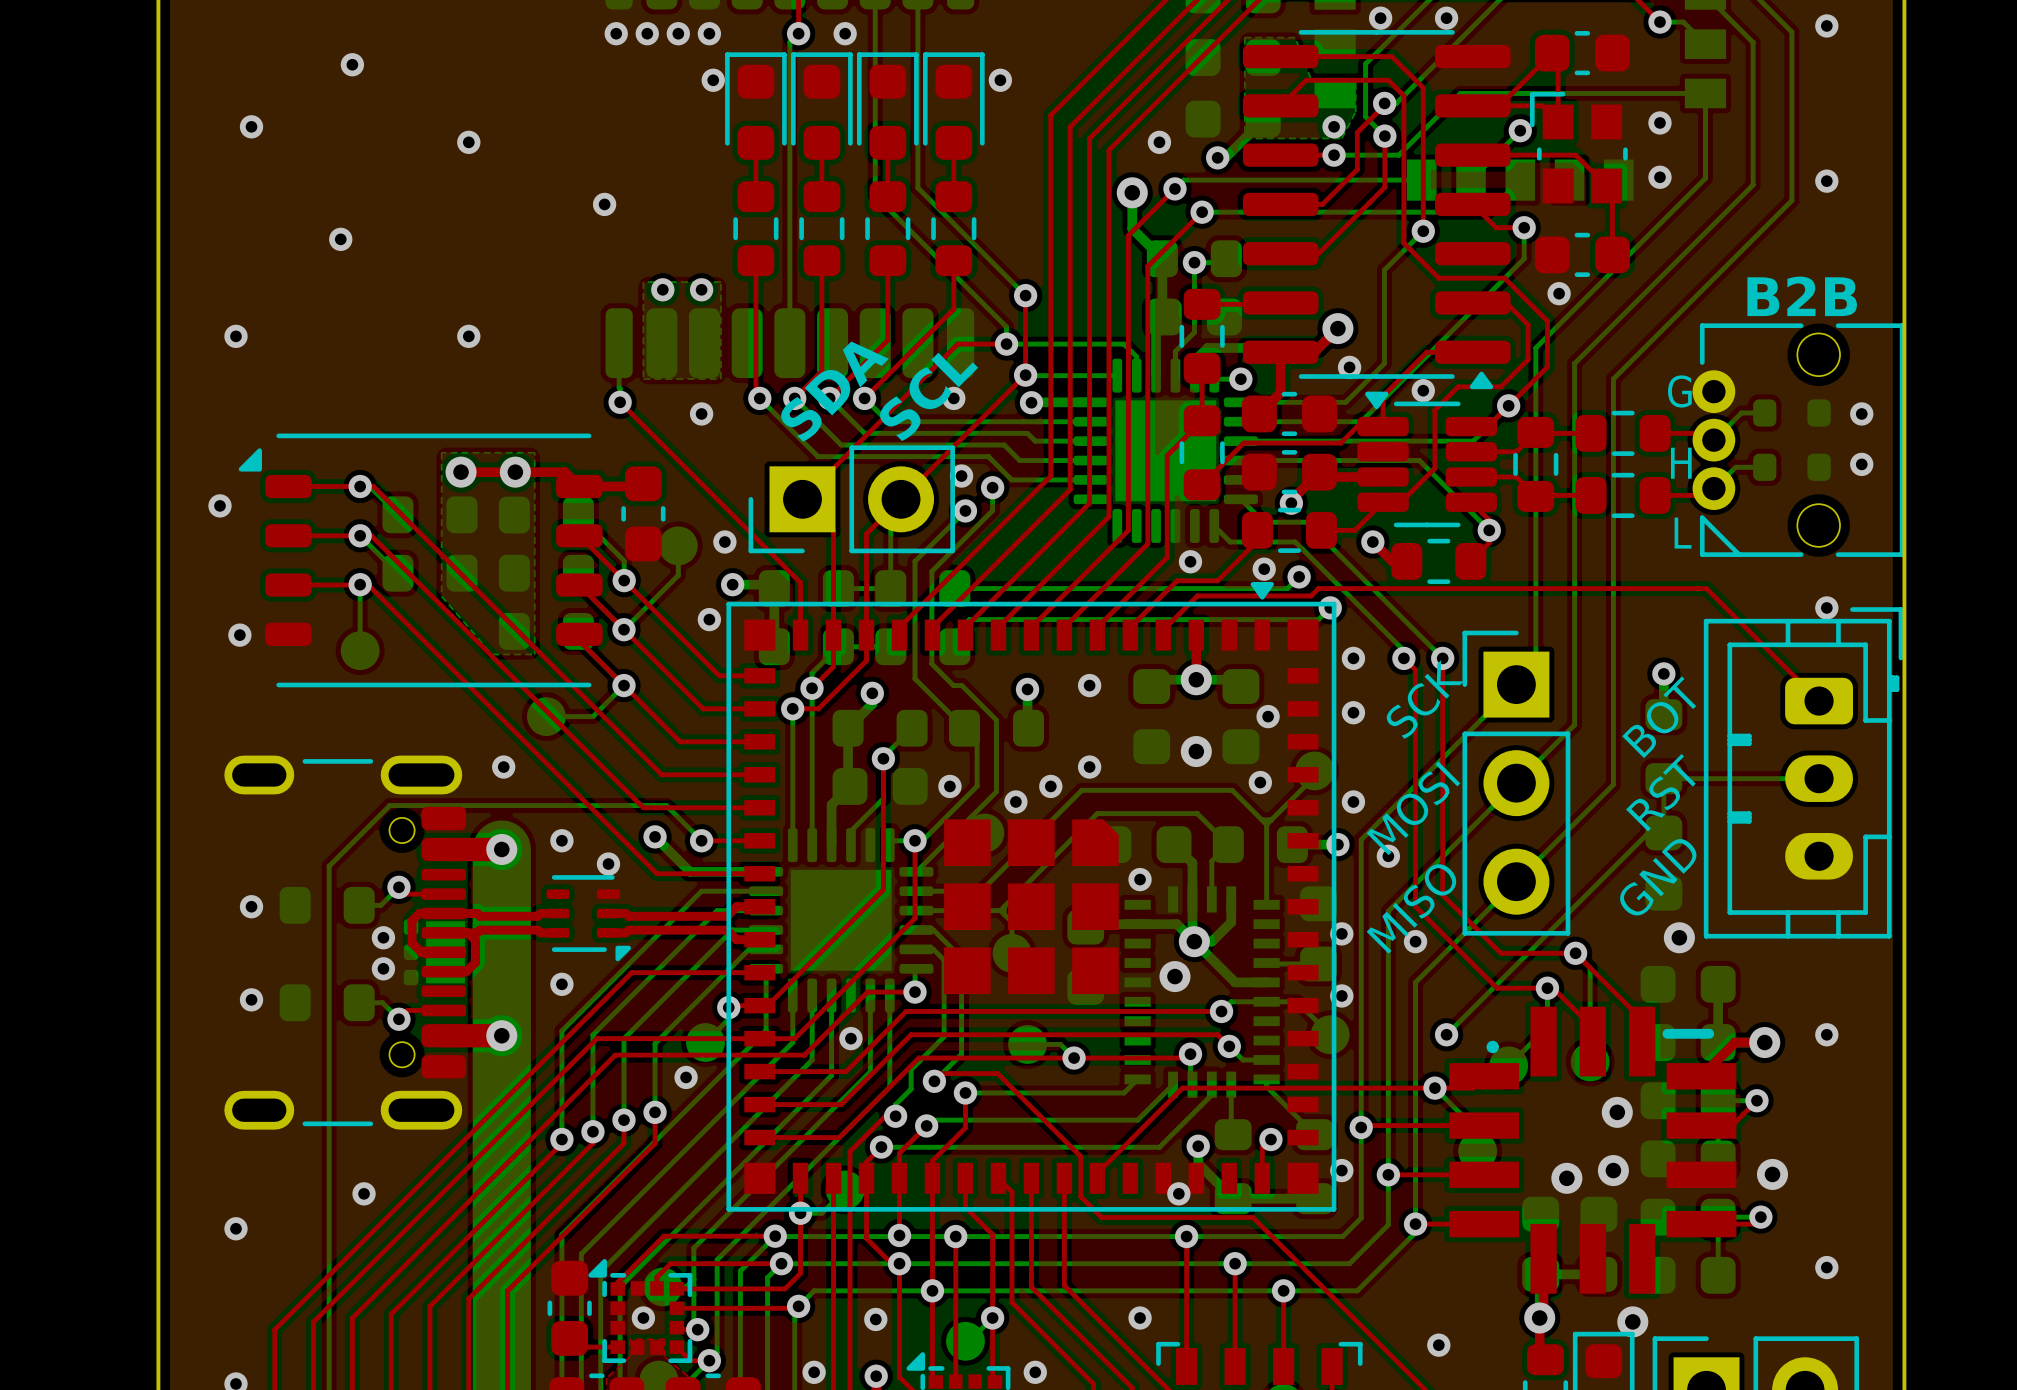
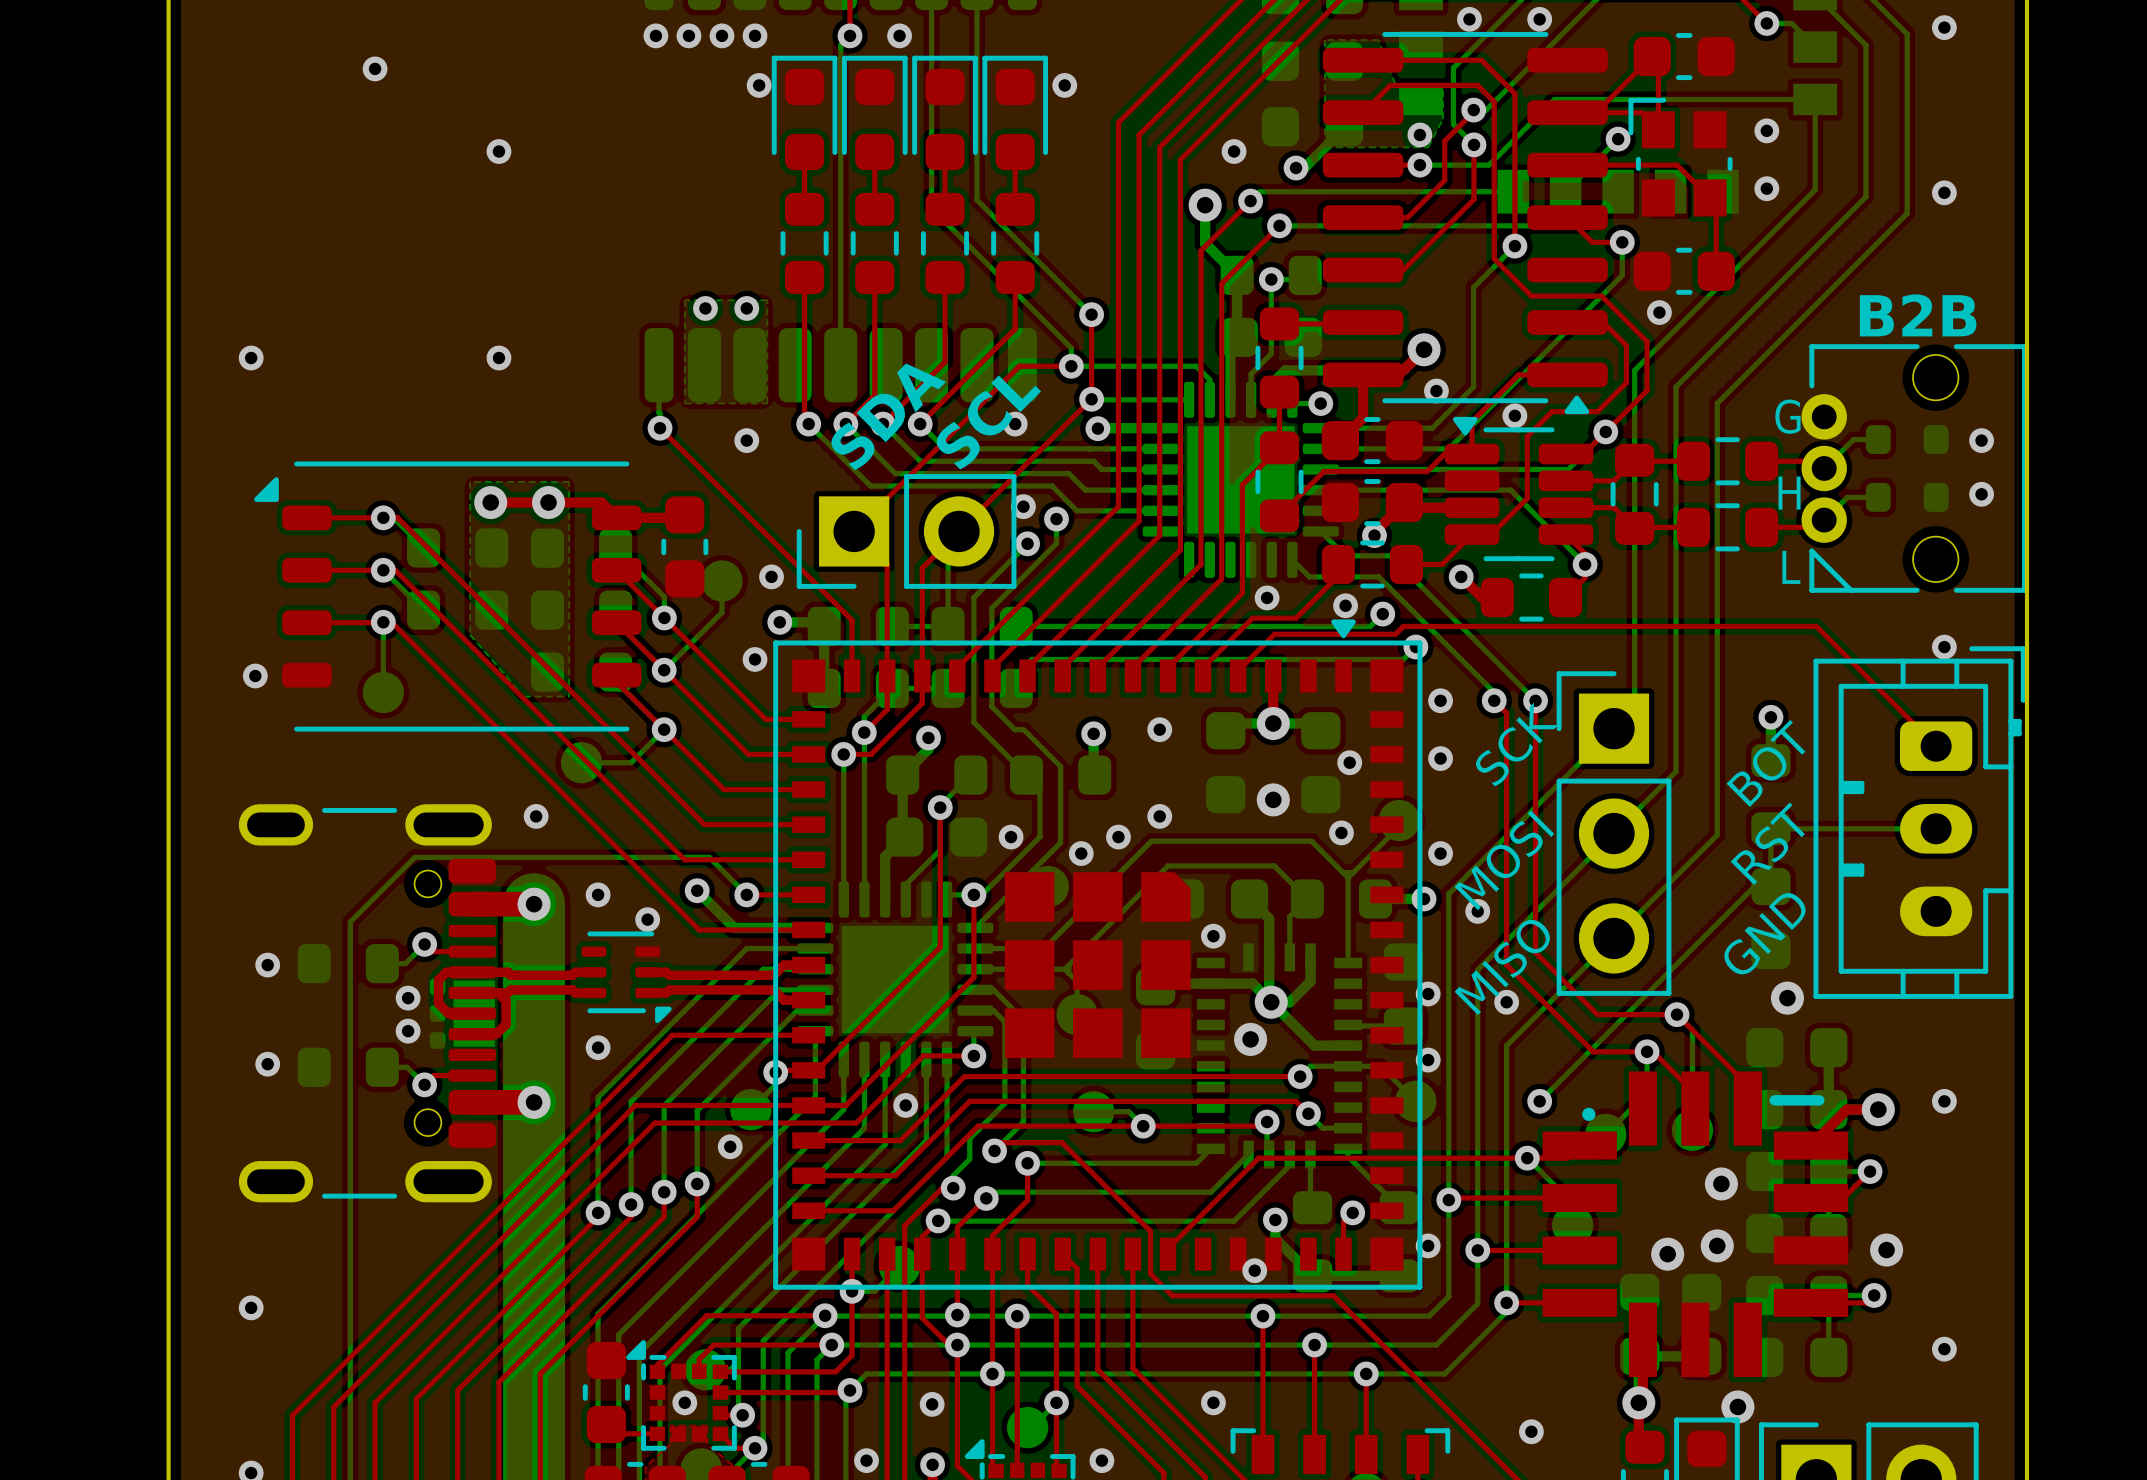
via: (251, 126) -> none
via: (604, 204) -> none
via: (340, 239) -> none
via: (219, 505) -> none
via: (364, 1193) -> none

